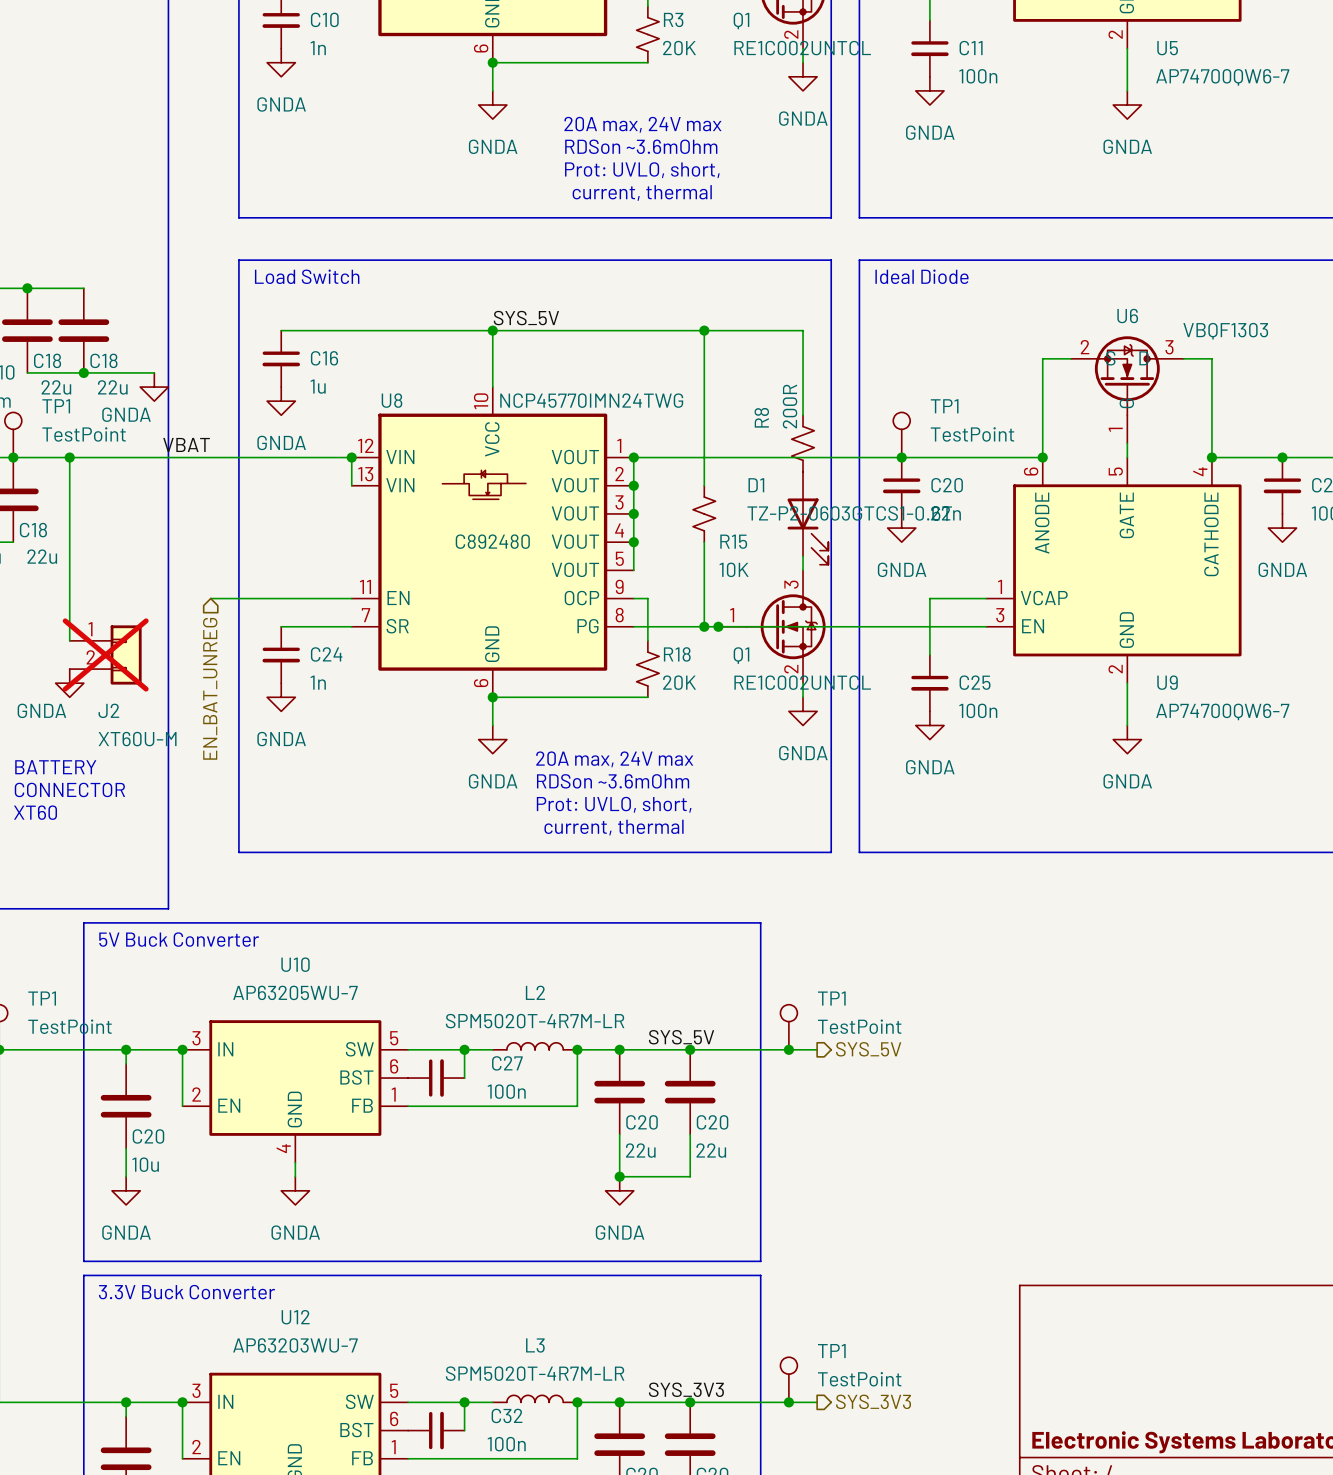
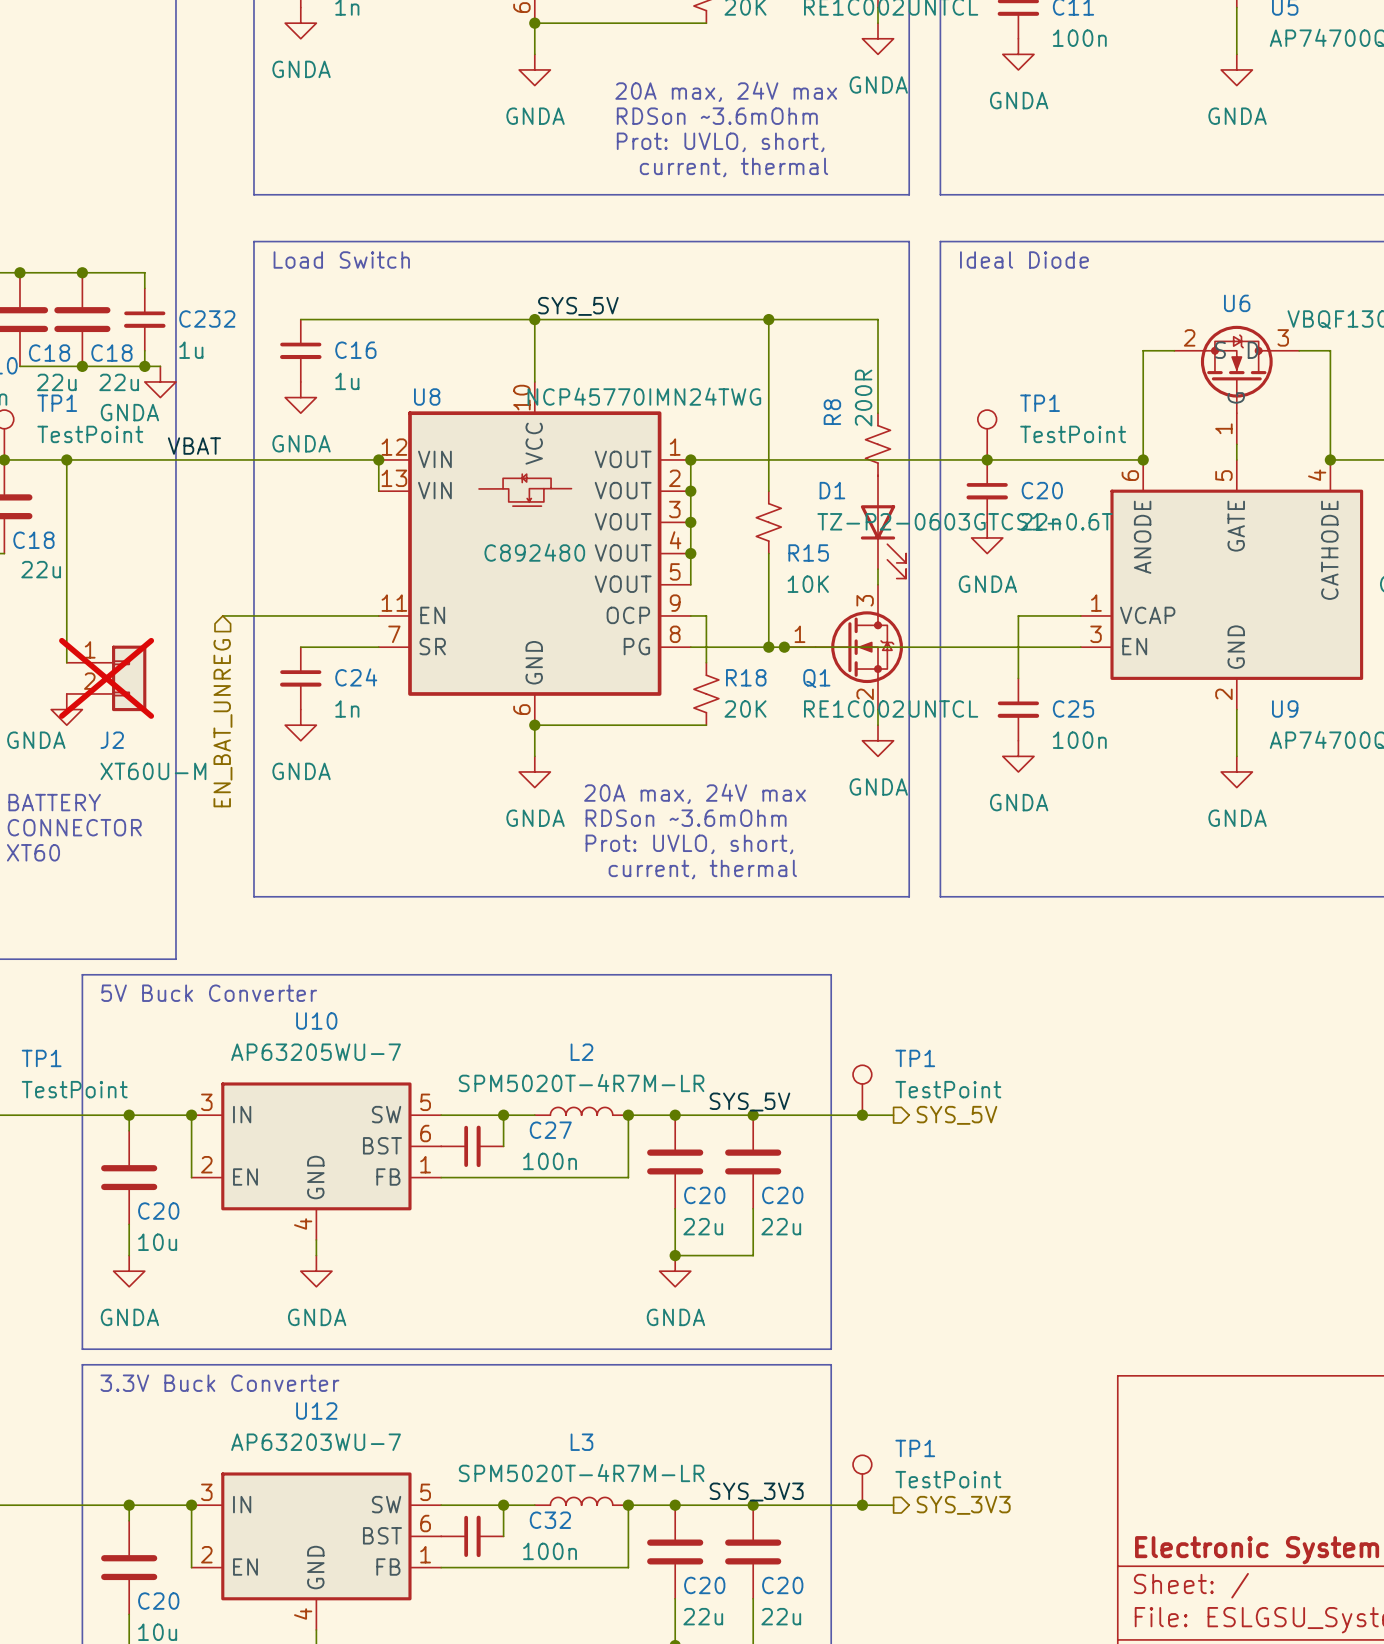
wire: none -> (82, 272) (144, 272) (144, 288)
junction: none -> (82, 272)
C232: none -> 1u (144, 319)
wire: none -> (144, 350) (144, 366)
junction: none -> (144, 366)

